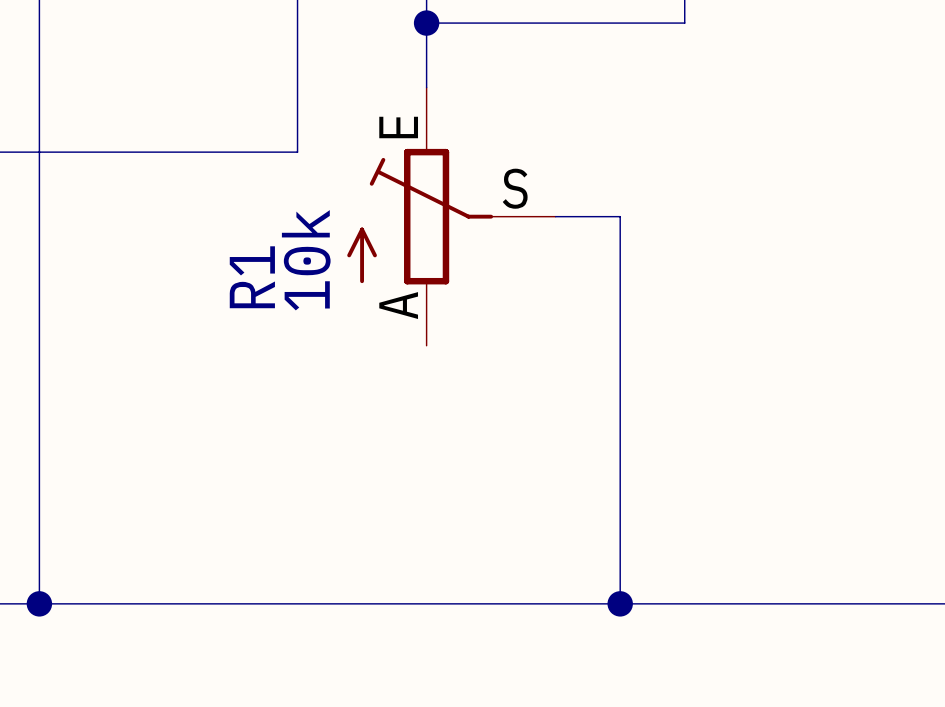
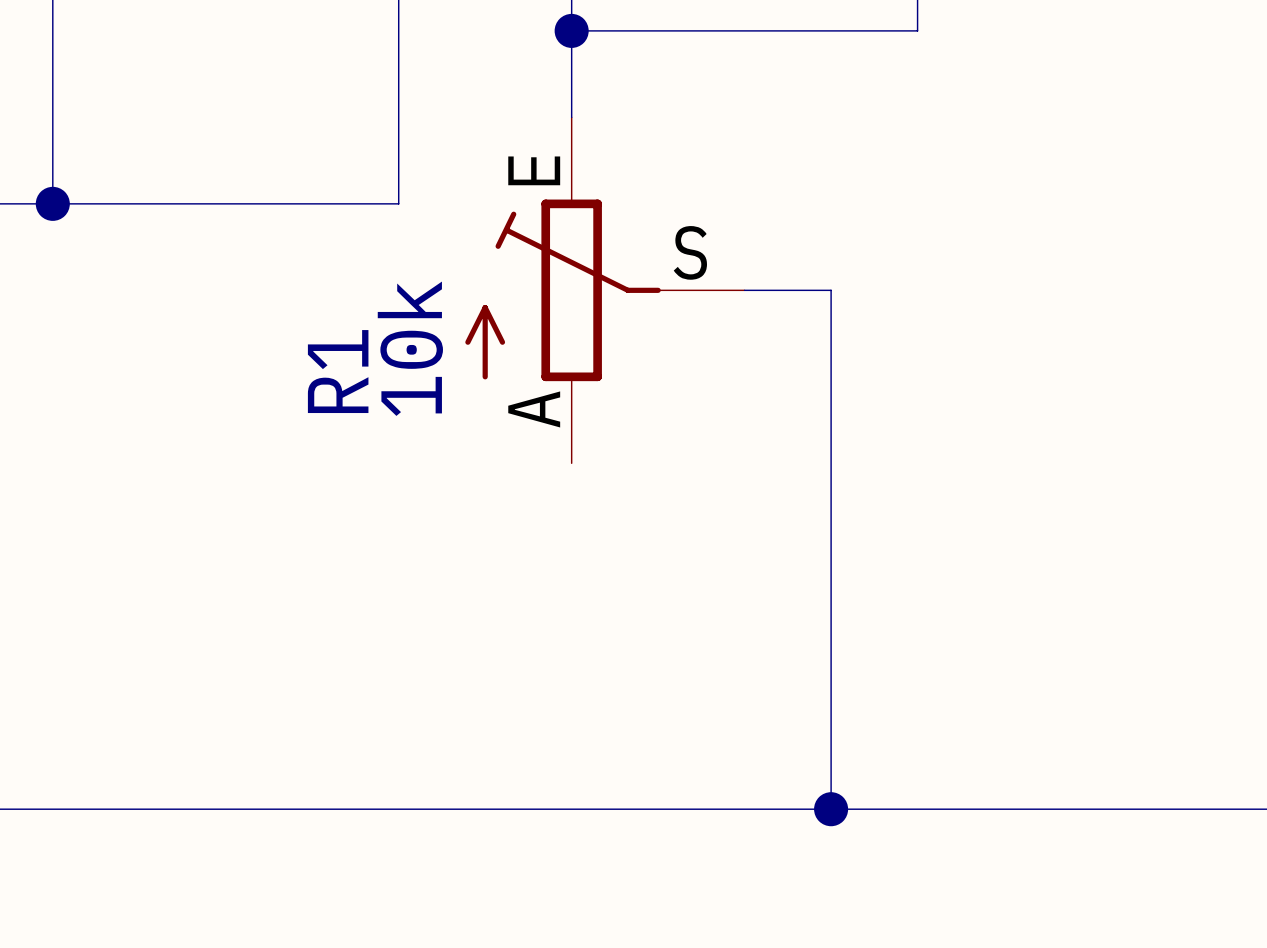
wire: (39, 152) (39, 603) -> none
junction: none -> (52, 203)
junction: (39, 603) -> none

